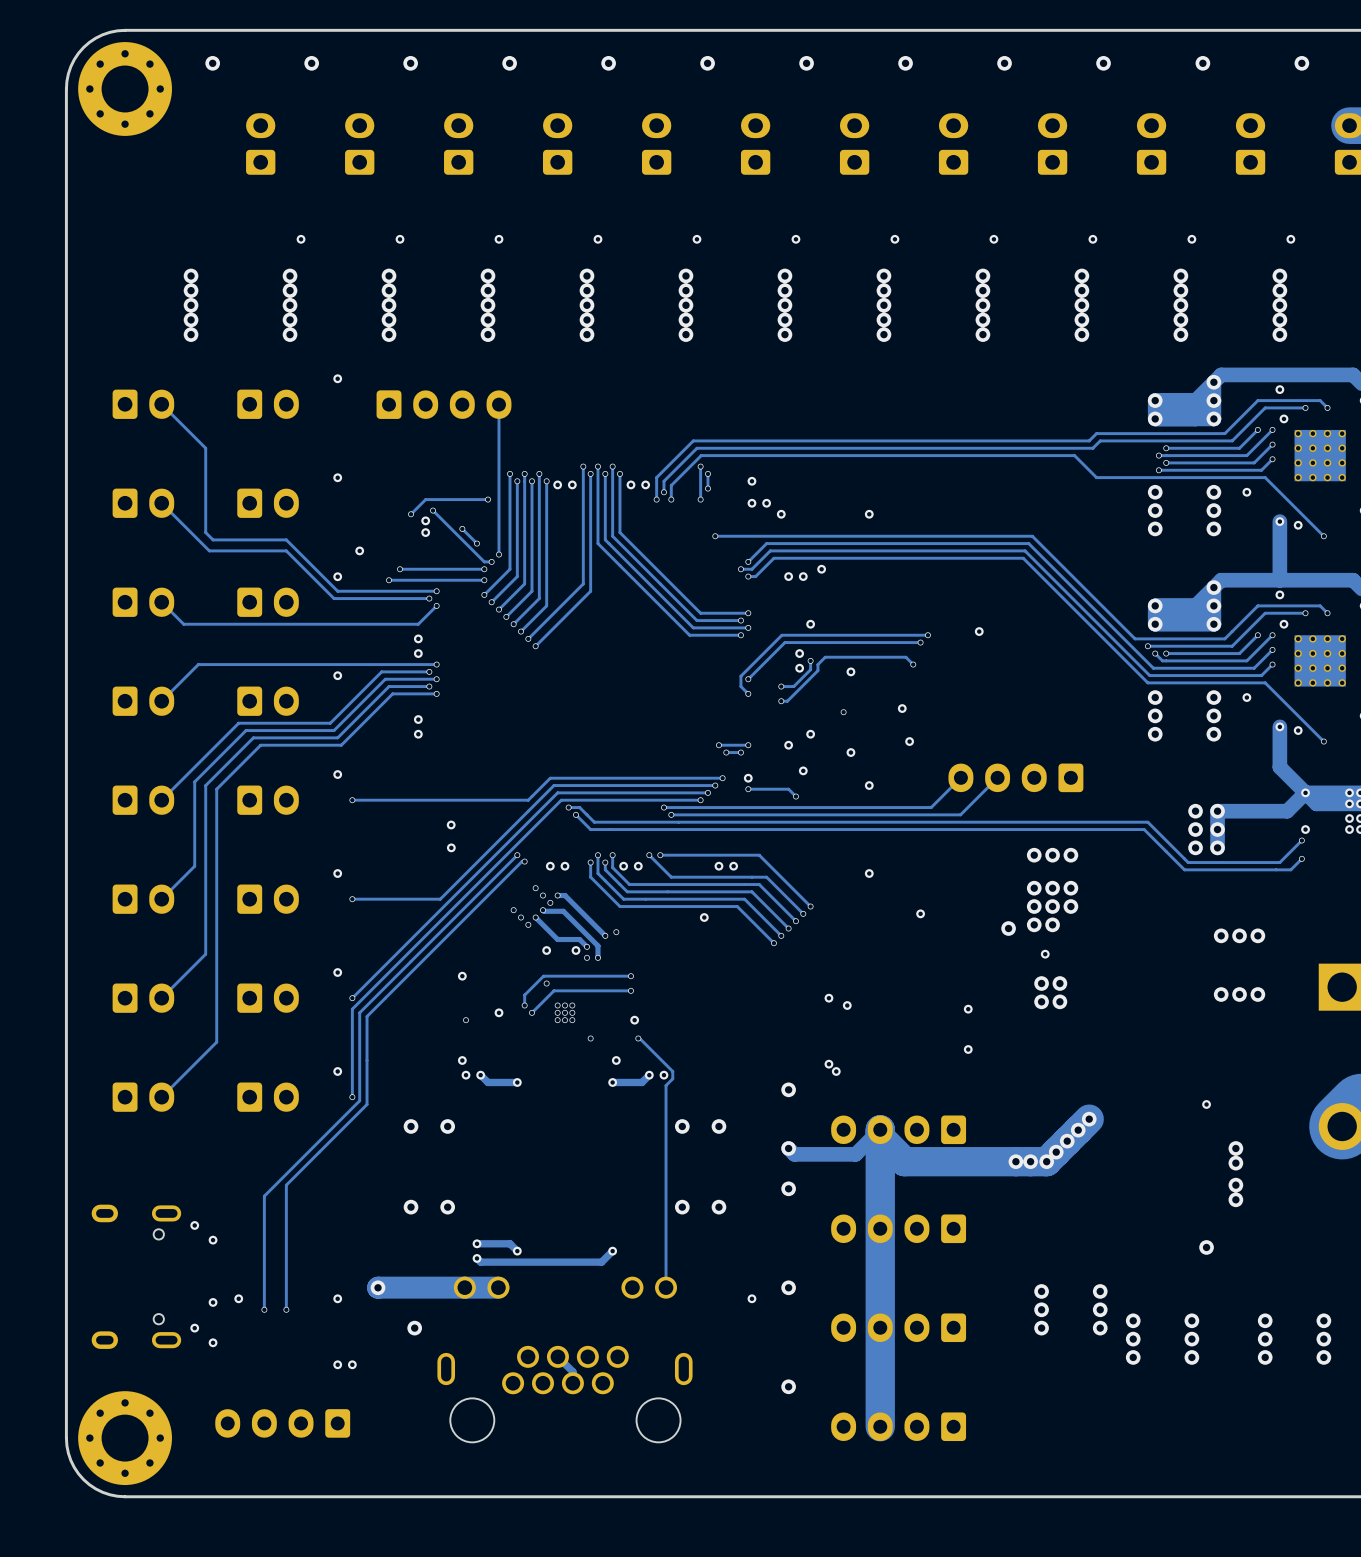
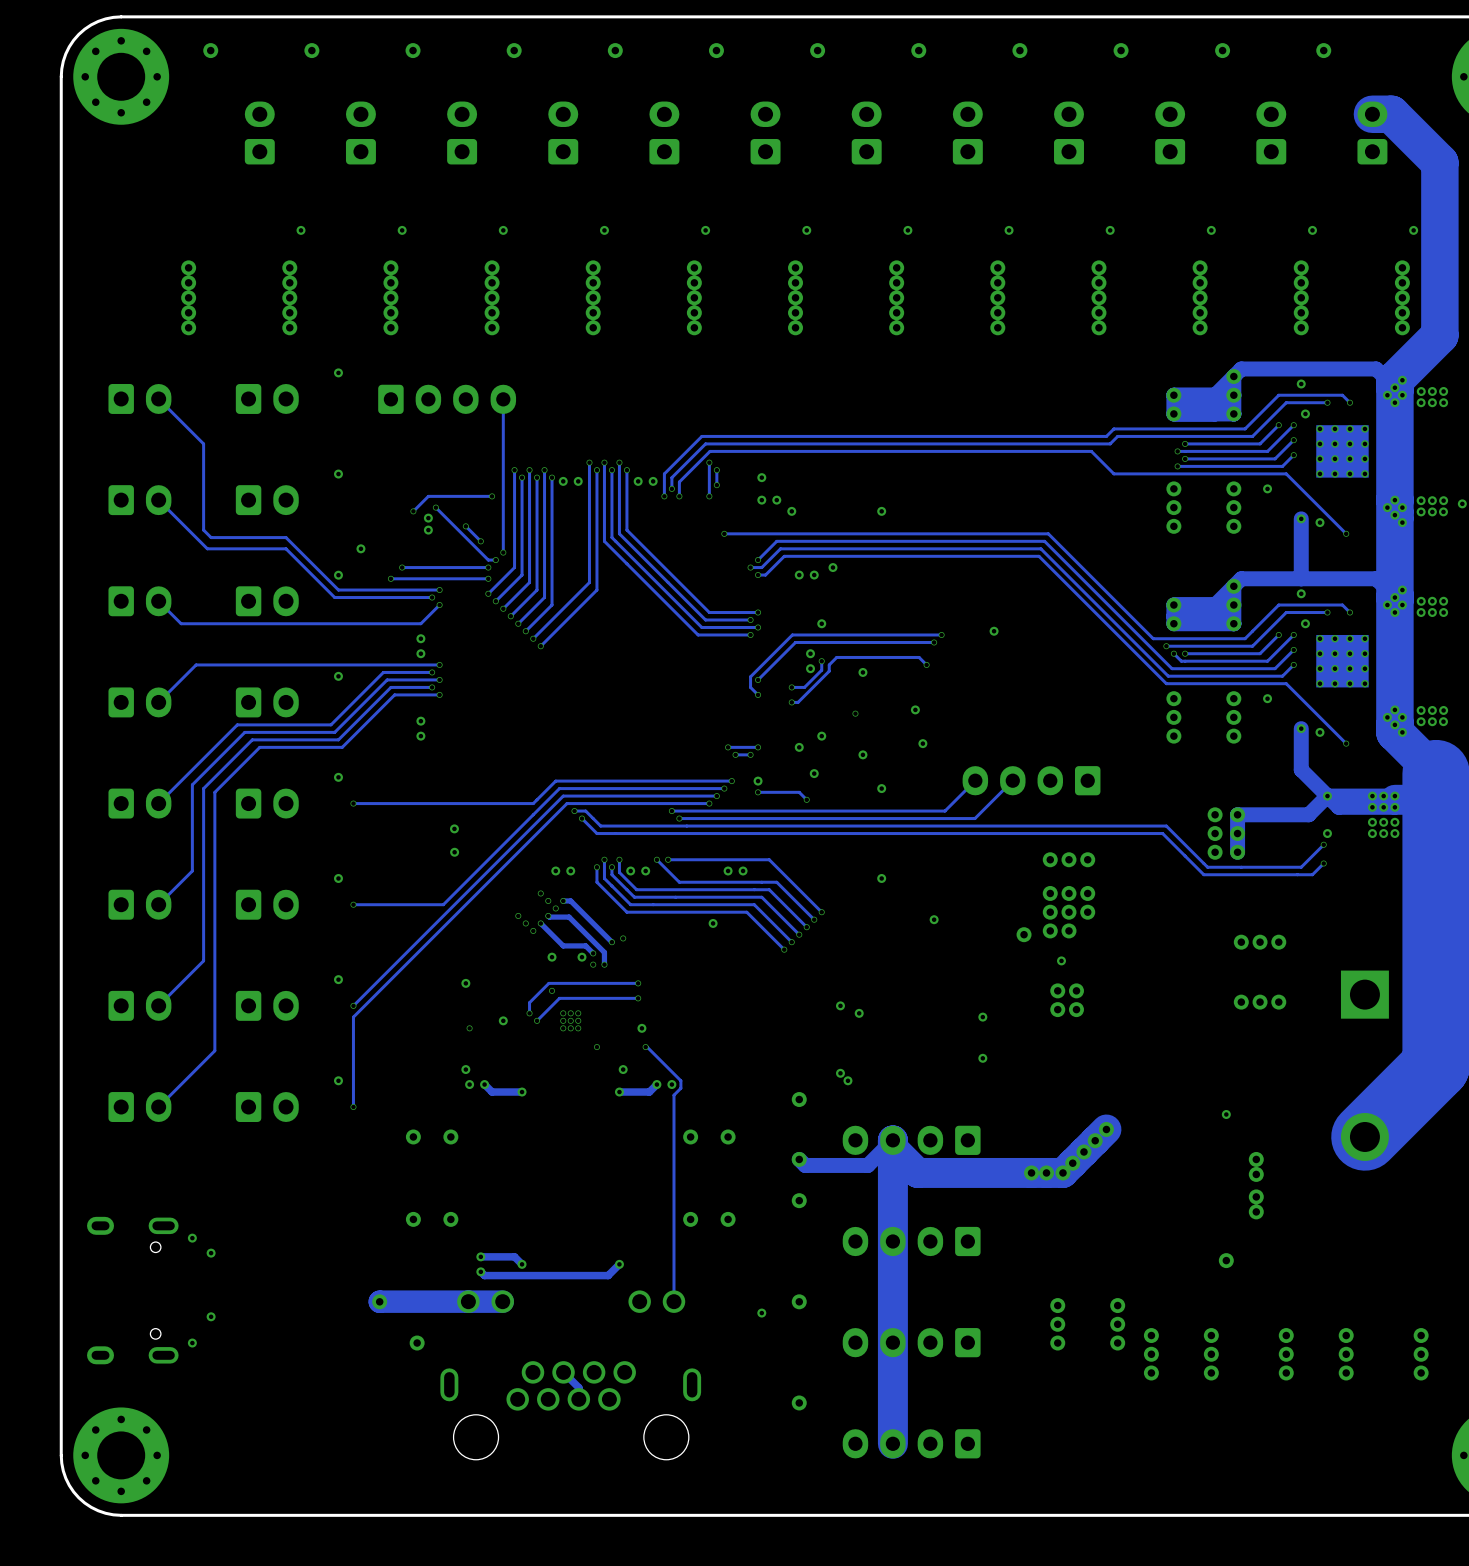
track: (517, 855) (359, 1012) (359, 1100) (264, 1196) (264, 1309) -> none
via: (517, 855) -> none
track: (524, 861) (521, 861) (367, 1016) (367, 1104) (286, 1185) (286, 1309) -> none
via: (524, 861) -> none
via: (238, 1298) -> none
via: (337, 1298) -> none
via: (264, 1309) -> none
via: (286, 1309) -> none
via: (213, 1342) -> none
via: (337, 1364) -> none
via: (352, 1364) -> none
part: (282, 1423) -> none

